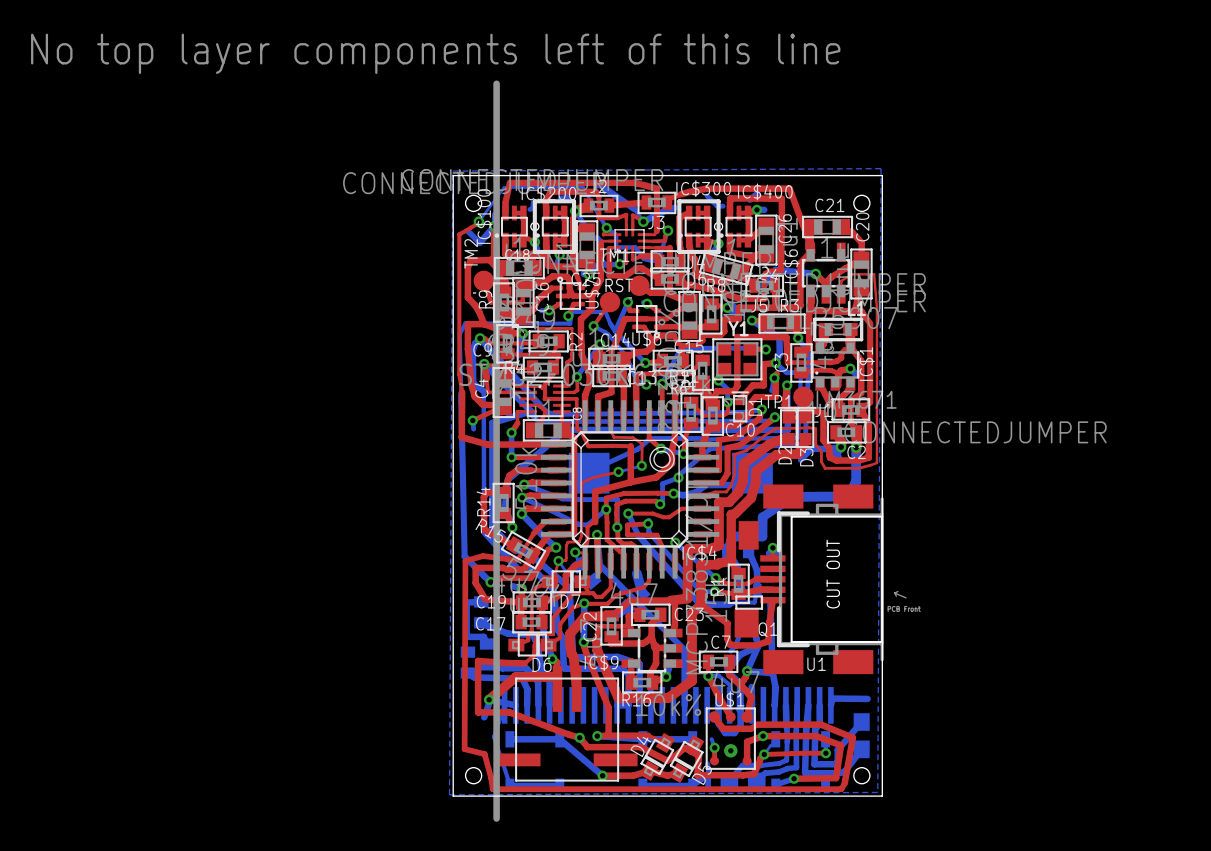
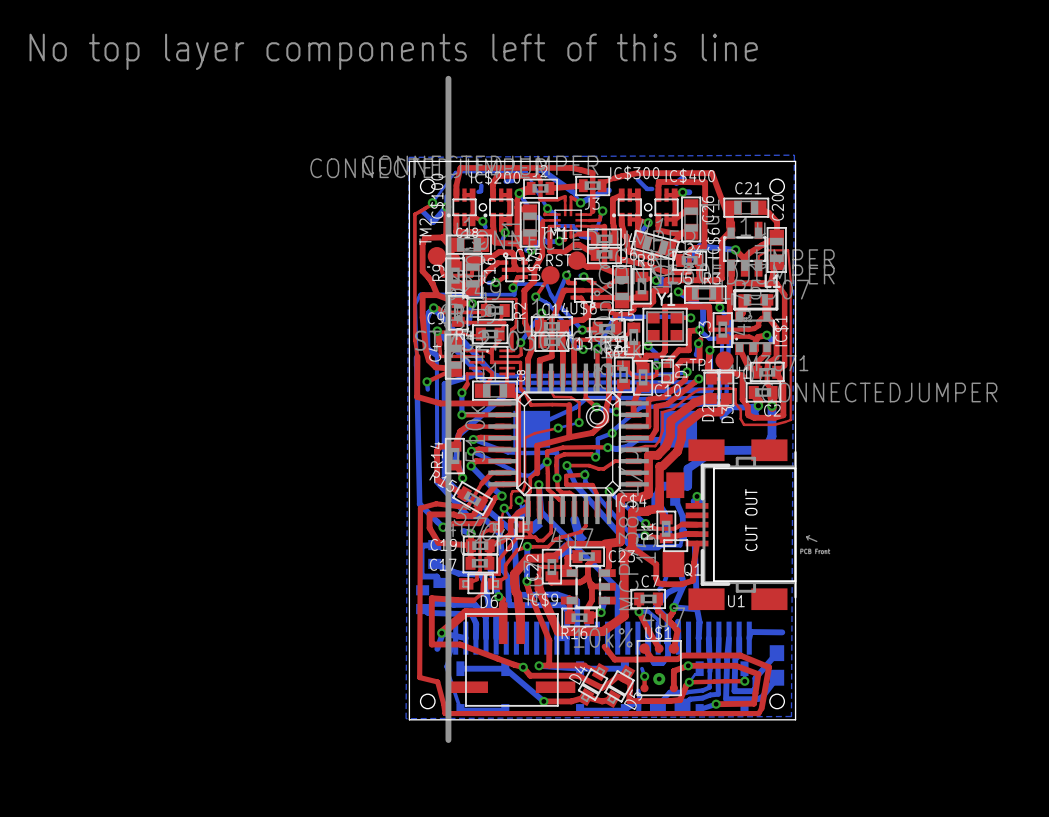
line: (534, 201) (574, 201) (574, 251) (534, 251) (534, 201) -> none
line: (679, 201) (718, 201) (718, 251) (679, 251) (679, 201) -> none
top track: none -> (604, 646) (614, 659) (652, 659)

